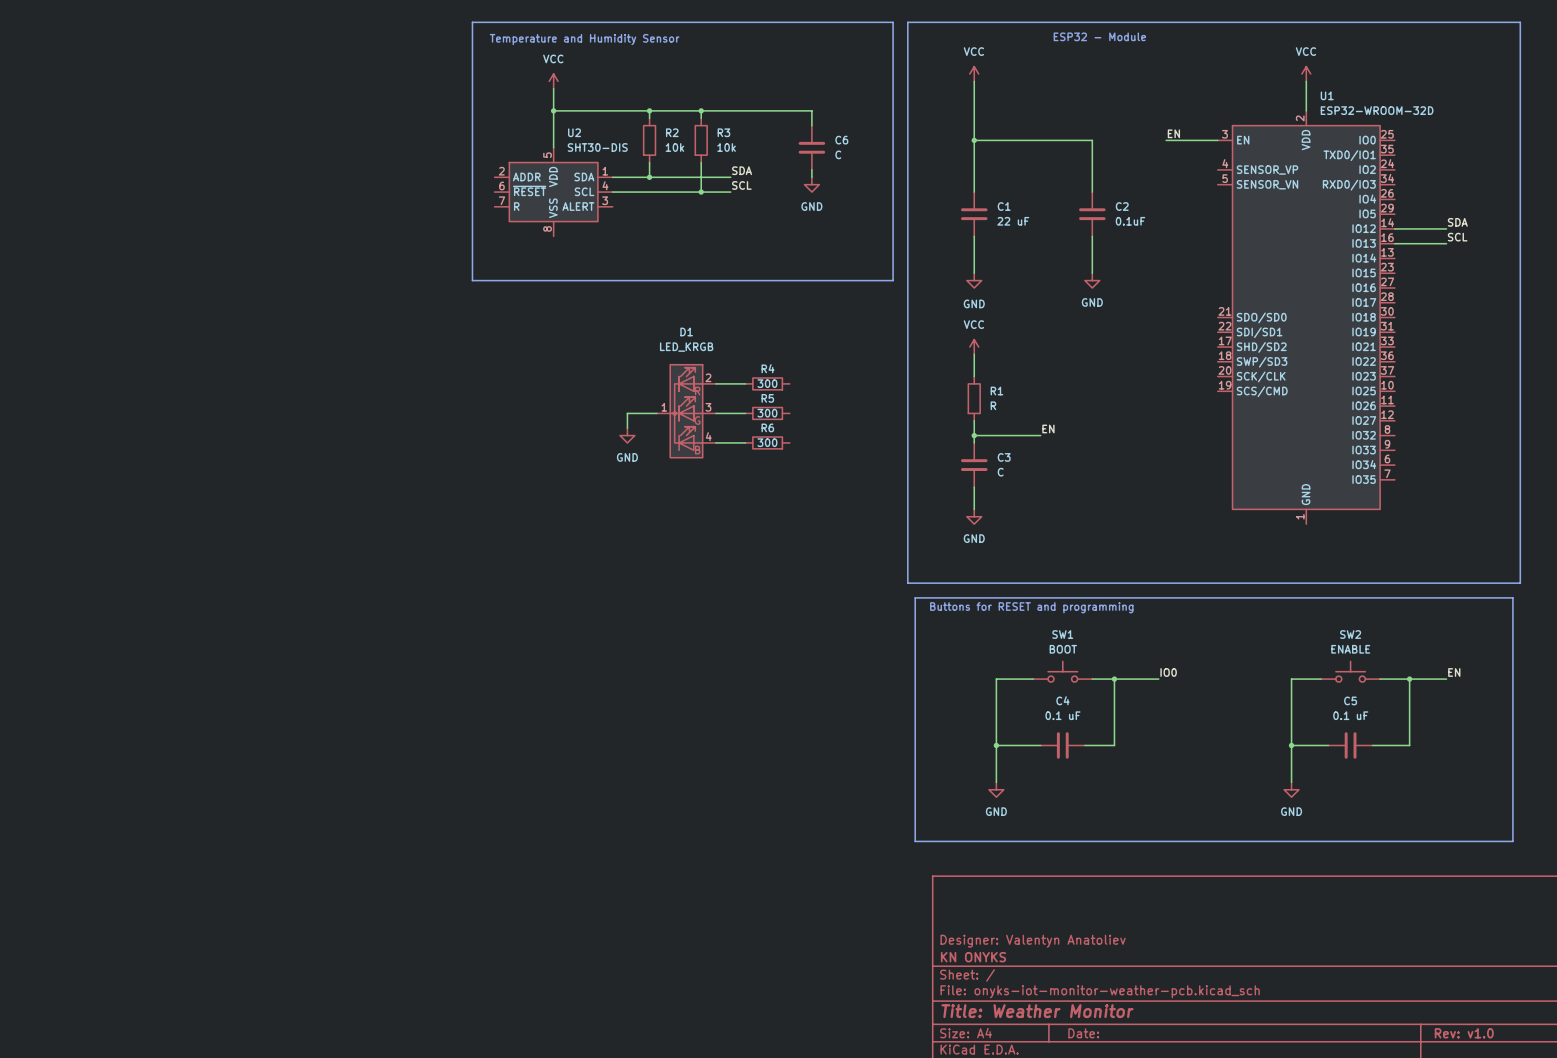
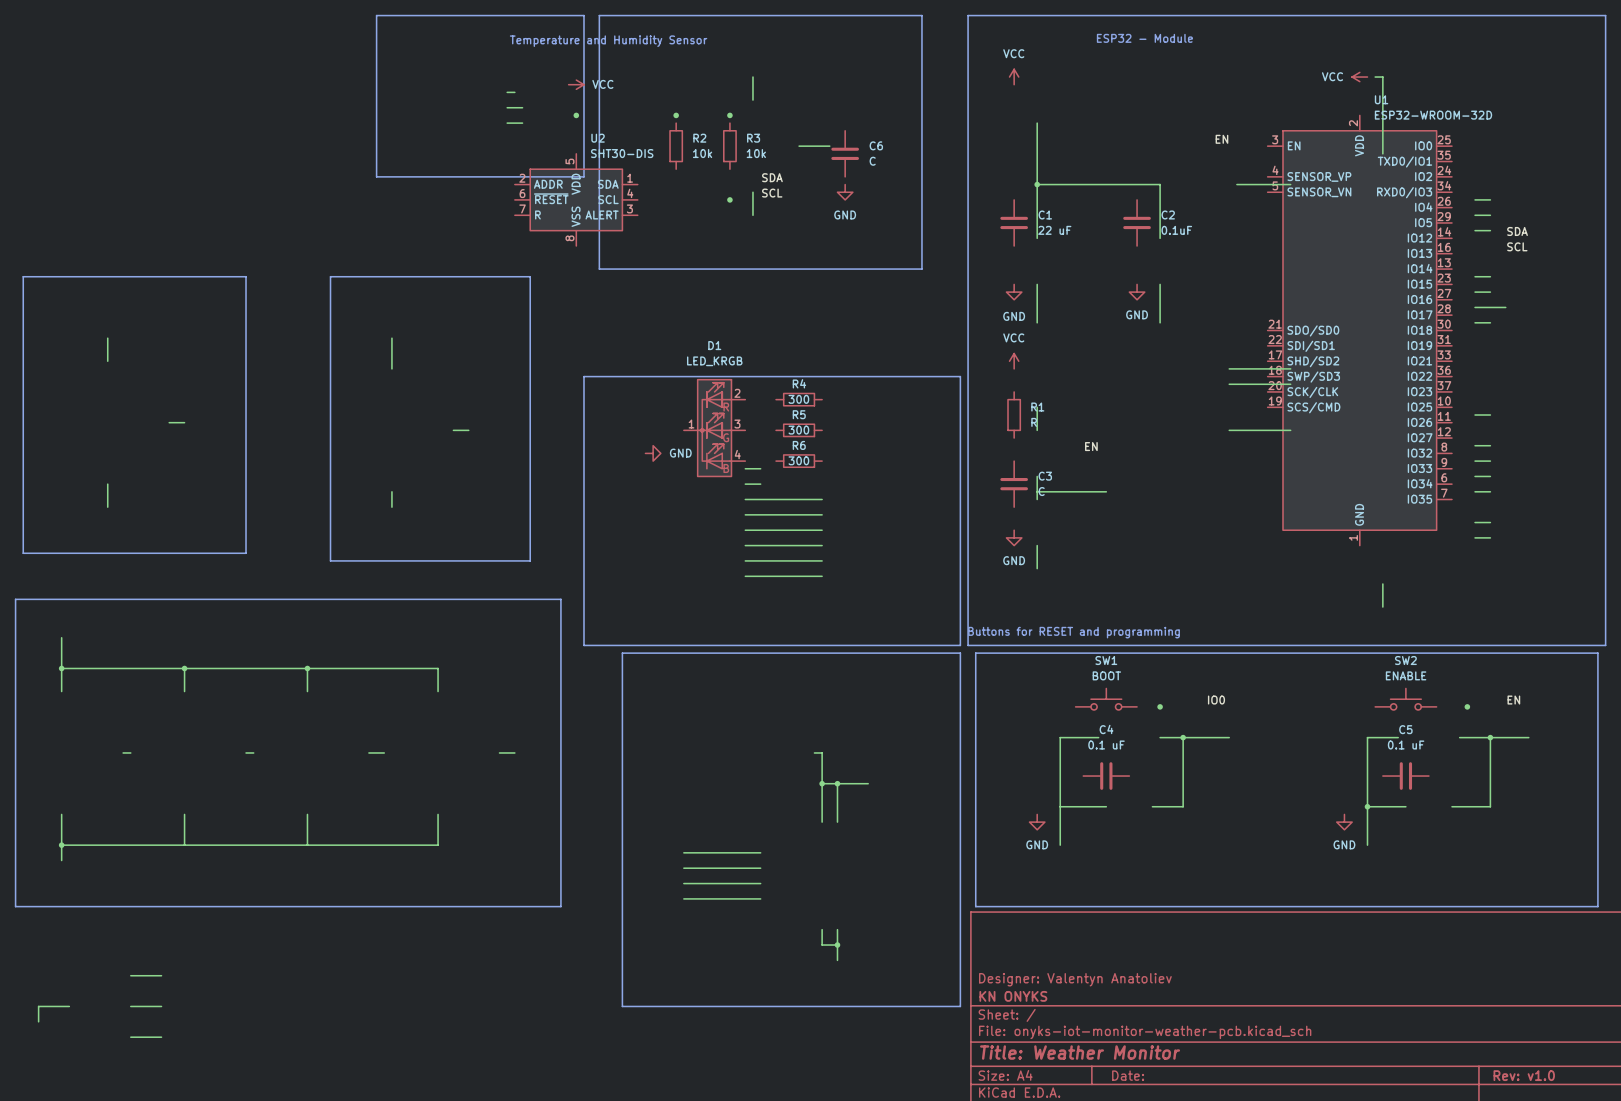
line: none -> (376, 15) (583, 15) (583, 176) (376, 176) (376, 15)
line: (472, 22) (893, 22) (893, 280) (472, 280) (472, 22) -> (599, 15) (599, 269) (921, 269) (921, 15) (599, 15)
line: (907, 22) (1520, 22) (1520, 583) (907, 583) (907, 22) -> (968, 15) (968, 645) (1605, 645) (1605, 15) (968, 15)
wire: none -> (752, 77) (752, 100)
power symbol rotation: 0° (1306, 73) -> 90° counterclockwise (1359, 77)
wire: none -> (1375, 77) (1382, 77) (1382, 153)
power symbol rotation: 0° (553, 81) -> 90° clockwise (576, 84)
wire: (974, 81) (974, 192) -> (1037, 123) (1037, 238)
wire: (1306, 81) (1306, 110) -> none
wire: none -> (507, 92) (514, 92)
wire: (553, 88) (553, 147) -> none
wire: none -> (507, 107) (522, 107)
wire: (553, 110) (811, 110) (811, 125) -> none
wire: (649, 110) (649, 118) -> none
wire: (701, 110) (701, 118) -> none
wire: none -> (507, 123) (522, 123)
wire: none -> (799, 146) (829, 146)
wire: (974, 140) (1092, 140) (1092, 192) -> (1037, 184) (1160, 184) (1160, 238)
junction: (974, 140) -> none
wire: (1166, 140) (1217, 140) -> (1236, 184) (1290, 184)
wire: (649, 162) (649, 177) -> none
wire: (701, 162) (701, 192) -> none
wire: (811, 169) (811, 177) -> none
wire: (612, 177) (730, 177) -> none
junction: (649, 177) -> none
junction: none -> (1037, 184)
wire: none -> (752, 192) (752, 215)
wire: (612, 192) (730, 192) -> none
wire: none -> (1475, 199) (1490, 199)
wire: none -> (1475, 215) (1490, 215)
wire: none -> (1475, 230) (1490, 230)
wire: (1394, 228) (1446, 228) -> none
wire: (974, 236) (974, 273) -> (1037, 284) (1037, 322)
wire: (1092, 236) (1092, 273) -> (1160, 284) (1160, 322)
wire: (1394, 243) (1446, 243) -> none
line: none -> (23, 276) (246, 276) (246, 553) (23, 553) (23, 276)
line: none -> (330, 276) (530, 276) (530, 560) (330, 560) (330, 276)
wire: none -> (1475, 276) (1490, 276)
wire: none -> (1475, 292) (1490, 292)
wire: none -> (1475, 307) (1505, 307)
wire: none -> (1475, 322) (1490, 322)
wire: none -> (107, 338) (107, 361)
wire: none -> (391, 338) (391, 368)
wire: (974, 354) (974, 376) -> (1037, 407) (1037, 430)
wire: none -> (1229, 368) (1290, 368)
line: none -> (583, 376) (960, 376) (960, 645) (583, 645) (583, 376)
wire: none -> (1229, 384) (1290, 384)
wire: (715, 383) (745, 383) -> none
wire: none -> (1475, 415) (1490, 415)
wire: none -> (169, 422) (184, 422)
wire: none -> (453, 430) (468, 430)
wire: (656, 413) (627, 413) (627, 428) -> none
wire: (715, 413) (745, 413) -> none
wire: none -> (1229, 430) (1290, 430)
wire: (974, 420) (974, 442) -> (1037, 476) (1037, 499)
wire: none -> (1475, 445) (1490, 445)
power symbol rotation: 0° (627, 435) -> 90° counterclockwise (653, 453)
wire: (974, 435) (1040, 435) -> (1037, 491) (1106, 491)
junction: (974, 435) -> none
wire: (715, 442) (745, 442) -> none
wire: none -> (1475, 461) (1490, 461)
wire: none -> (745, 468) (760, 468)
wire: none -> (1475, 476) (1490, 476)
wire: none -> (107, 484) (107, 507)
wire: none -> (745, 484) (760, 484)
wire: none -> (391, 491) (391, 507)
wire: none -> (1475, 491) (1490, 491)
wire: none -> (745, 499) (822, 499)
wire: (974, 487) (974, 509) -> (1037, 545) (1037, 568)
wire: none -> (745, 514) (822, 514)
wire: none -> (1475, 522) (1490, 522)
wire: none -> (745, 530) (822, 530)
wire: none -> (1475, 537) (1490, 537)
wire: none -> (745, 545) (822, 545)
wire: none -> (745, 560) (822, 560)
wire: none -> (745, 576) (822, 576)
wire: none -> (1382, 583) (1382, 607)
line: none -> (15, 599) (560, 599) (560, 906) (15, 906) (15, 599)
line: (915, 597) (1512, 597) (1512, 841) (915, 841) (915, 597) -> (975, 653) (1597, 653) (1597, 906) (975, 906) (975, 653)
wire: none -> (61, 637) (61, 691)
line: none -> (622, 653) (960, 653) (960, 1006) (622, 1006) (622, 653)
wire: none -> (61, 668) (438, 668) (438, 691)
junction: none -> (61, 668)
wire: none -> (184, 668) (184, 691)
junction: none -> (184, 668)
wire: none -> (307, 668) (307, 691)
junction: none -> (307, 668)
wire: (1033, 679) (996, 679) (996, 782) -> (1098, 737) (1060, 737) (1060, 845)
wire: (1092, 679) (1158, 679) -> (1160, 737) (1229, 737)
wire: (1114, 679) (1114, 745) (1084, 745) -> (1183, 737) (1183, 806) (1152, 806)
wire: (1321, 679) (1291, 679) (1291, 782) -> (1398, 737) (1367, 737) (1367, 845)
wire: (1380, 679) (1446, 679) -> (1459, 737) (1528, 737)
wire: (1409, 679) (1409, 745) (1372, 745) -> (1490, 737) (1490, 806) (1451, 806)
junction: none -> (1183, 737)
junction: none -> (1490, 737)
wire: none -> (123, 752) (130, 752)
wire: none -> (246, 752) (253, 752)
wire: none -> (368, 752) (384, 752)
wire: none -> (499, 752) (514, 752)
wire: none -> (814, 752) (822, 752) (822, 822)
wire: (996, 745) (1040, 745) -> (1060, 806) (1106, 806)
junction: (996, 745) -> none
wire: (1291, 745) (1328, 745) -> (1367, 806) (1405, 806)
junction: (1291, 745) -> none
wire: none -> (822, 783) (868, 783)
junction: none -> (822, 783)
wire: none -> (837, 783) (837, 822)
junction: none -> (837, 783)
junction: none -> (1367, 806)
wire: none -> (61, 814) (61, 860)
wire: none -> (184, 814) (184, 845)
wire: none -> (307, 814) (307, 845)
wire: none -> (438, 814) (438, 845) (61, 845)
junction: none -> (61, 845)
wire: none -> (683, 852) (760, 852)
wire: none -> (683, 868) (760, 868)
wire: none -> (683, 883) (760, 883)
wire: none -> (683, 898) (760, 898)
wire: none -> (822, 929) (822, 945) (837, 945)
wire: none -> (837, 929) (837, 960)
junction: none -> (837, 945)
wire: none -> (130, 975) (161, 975)
wire: none -> (69, 1006) (38, 1006) (38, 1021)
wire: none -> (130, 1006) (161, 1006)
wire: none -> (130, 1037) (161, 1037)

